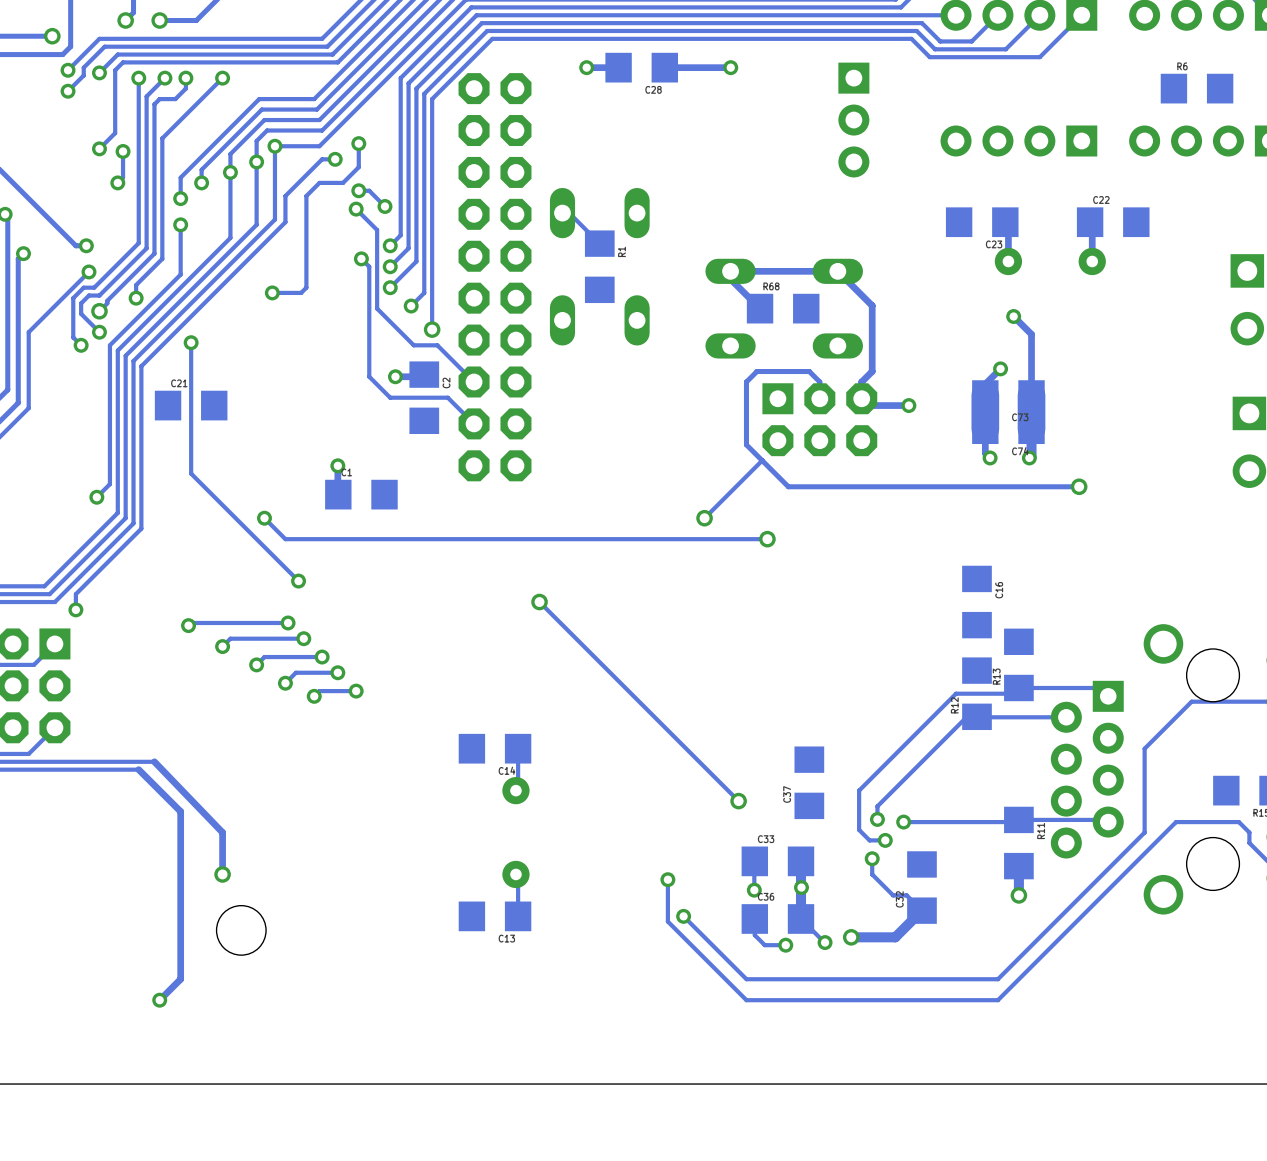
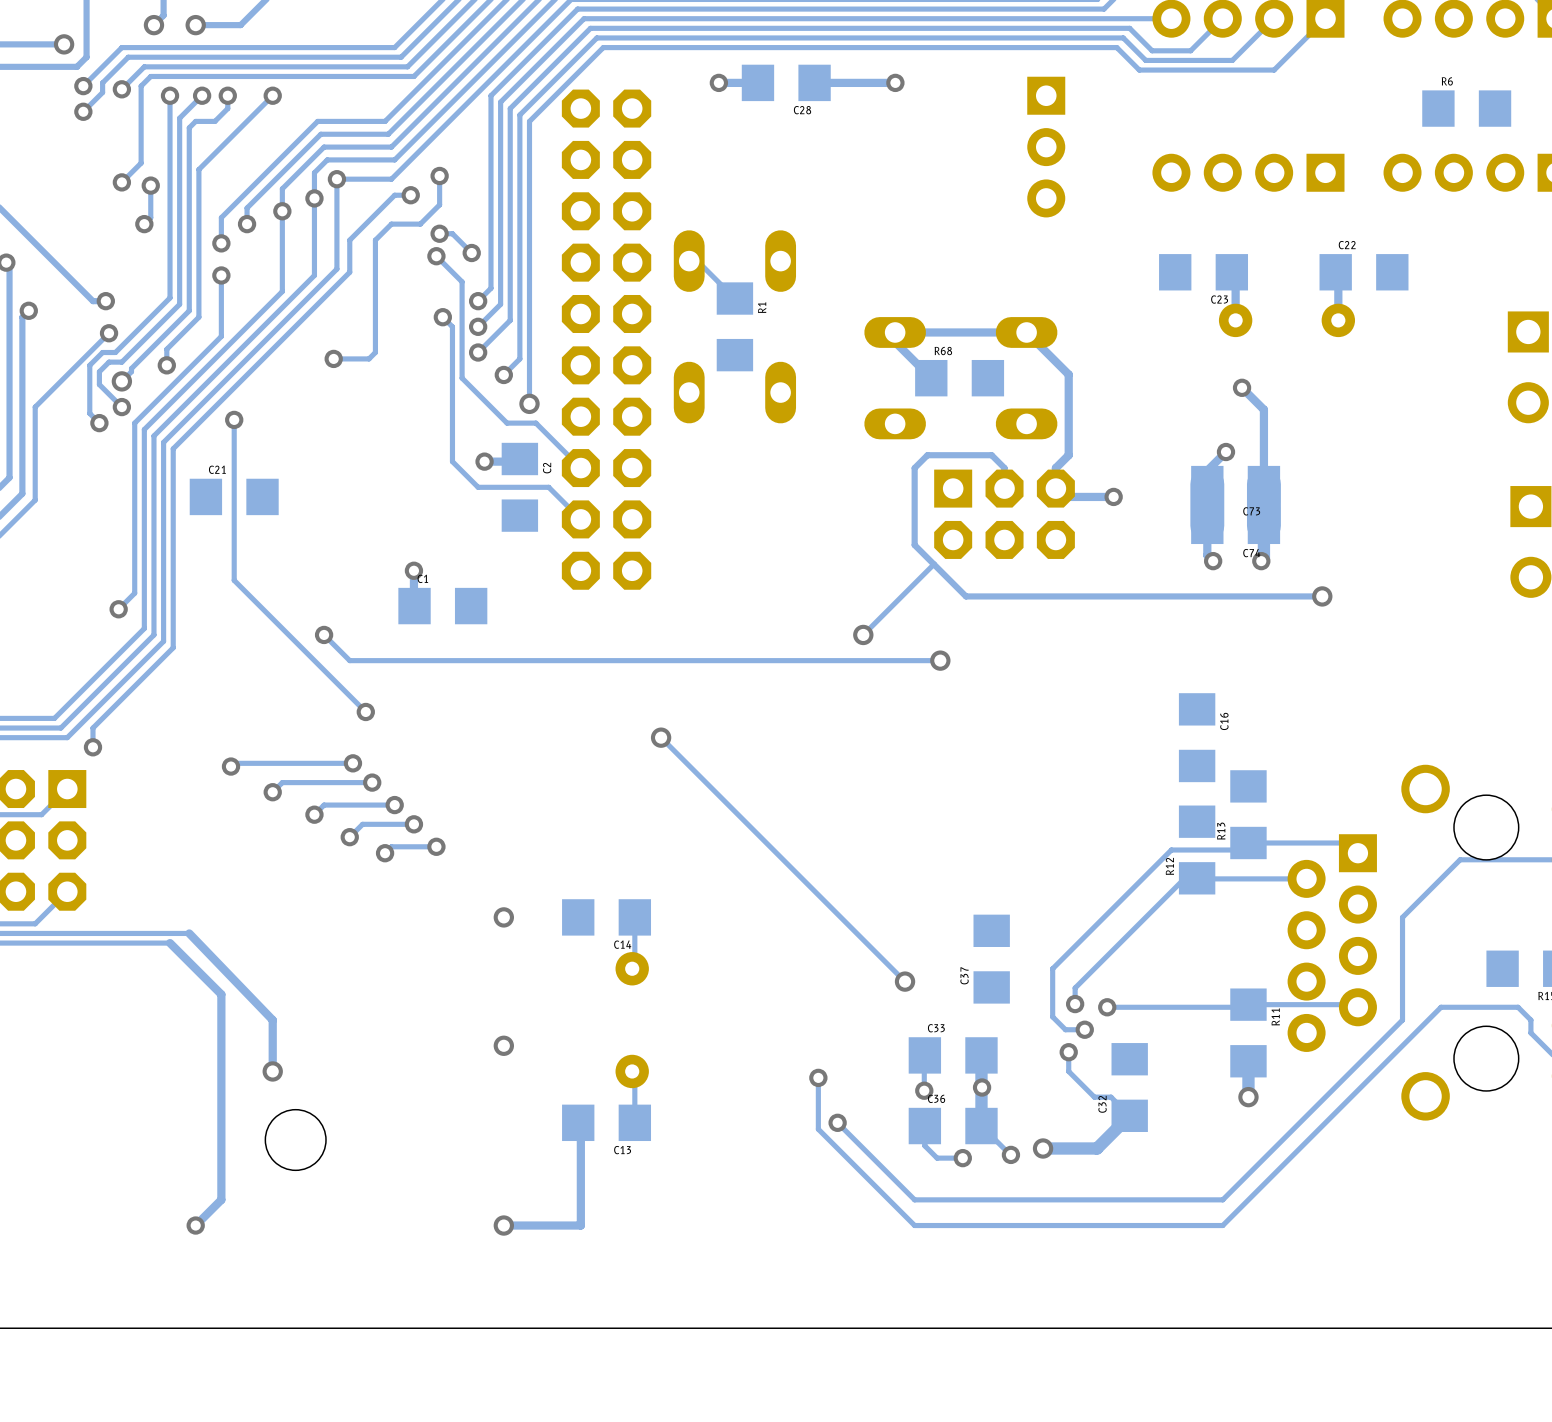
via: none -> (503, 917)
via: none -> (503, 1045)
track: none -> (578, 1122) (580, 1122) (580, 1225) (503, 1225)
via: none -> (503, 1225)

